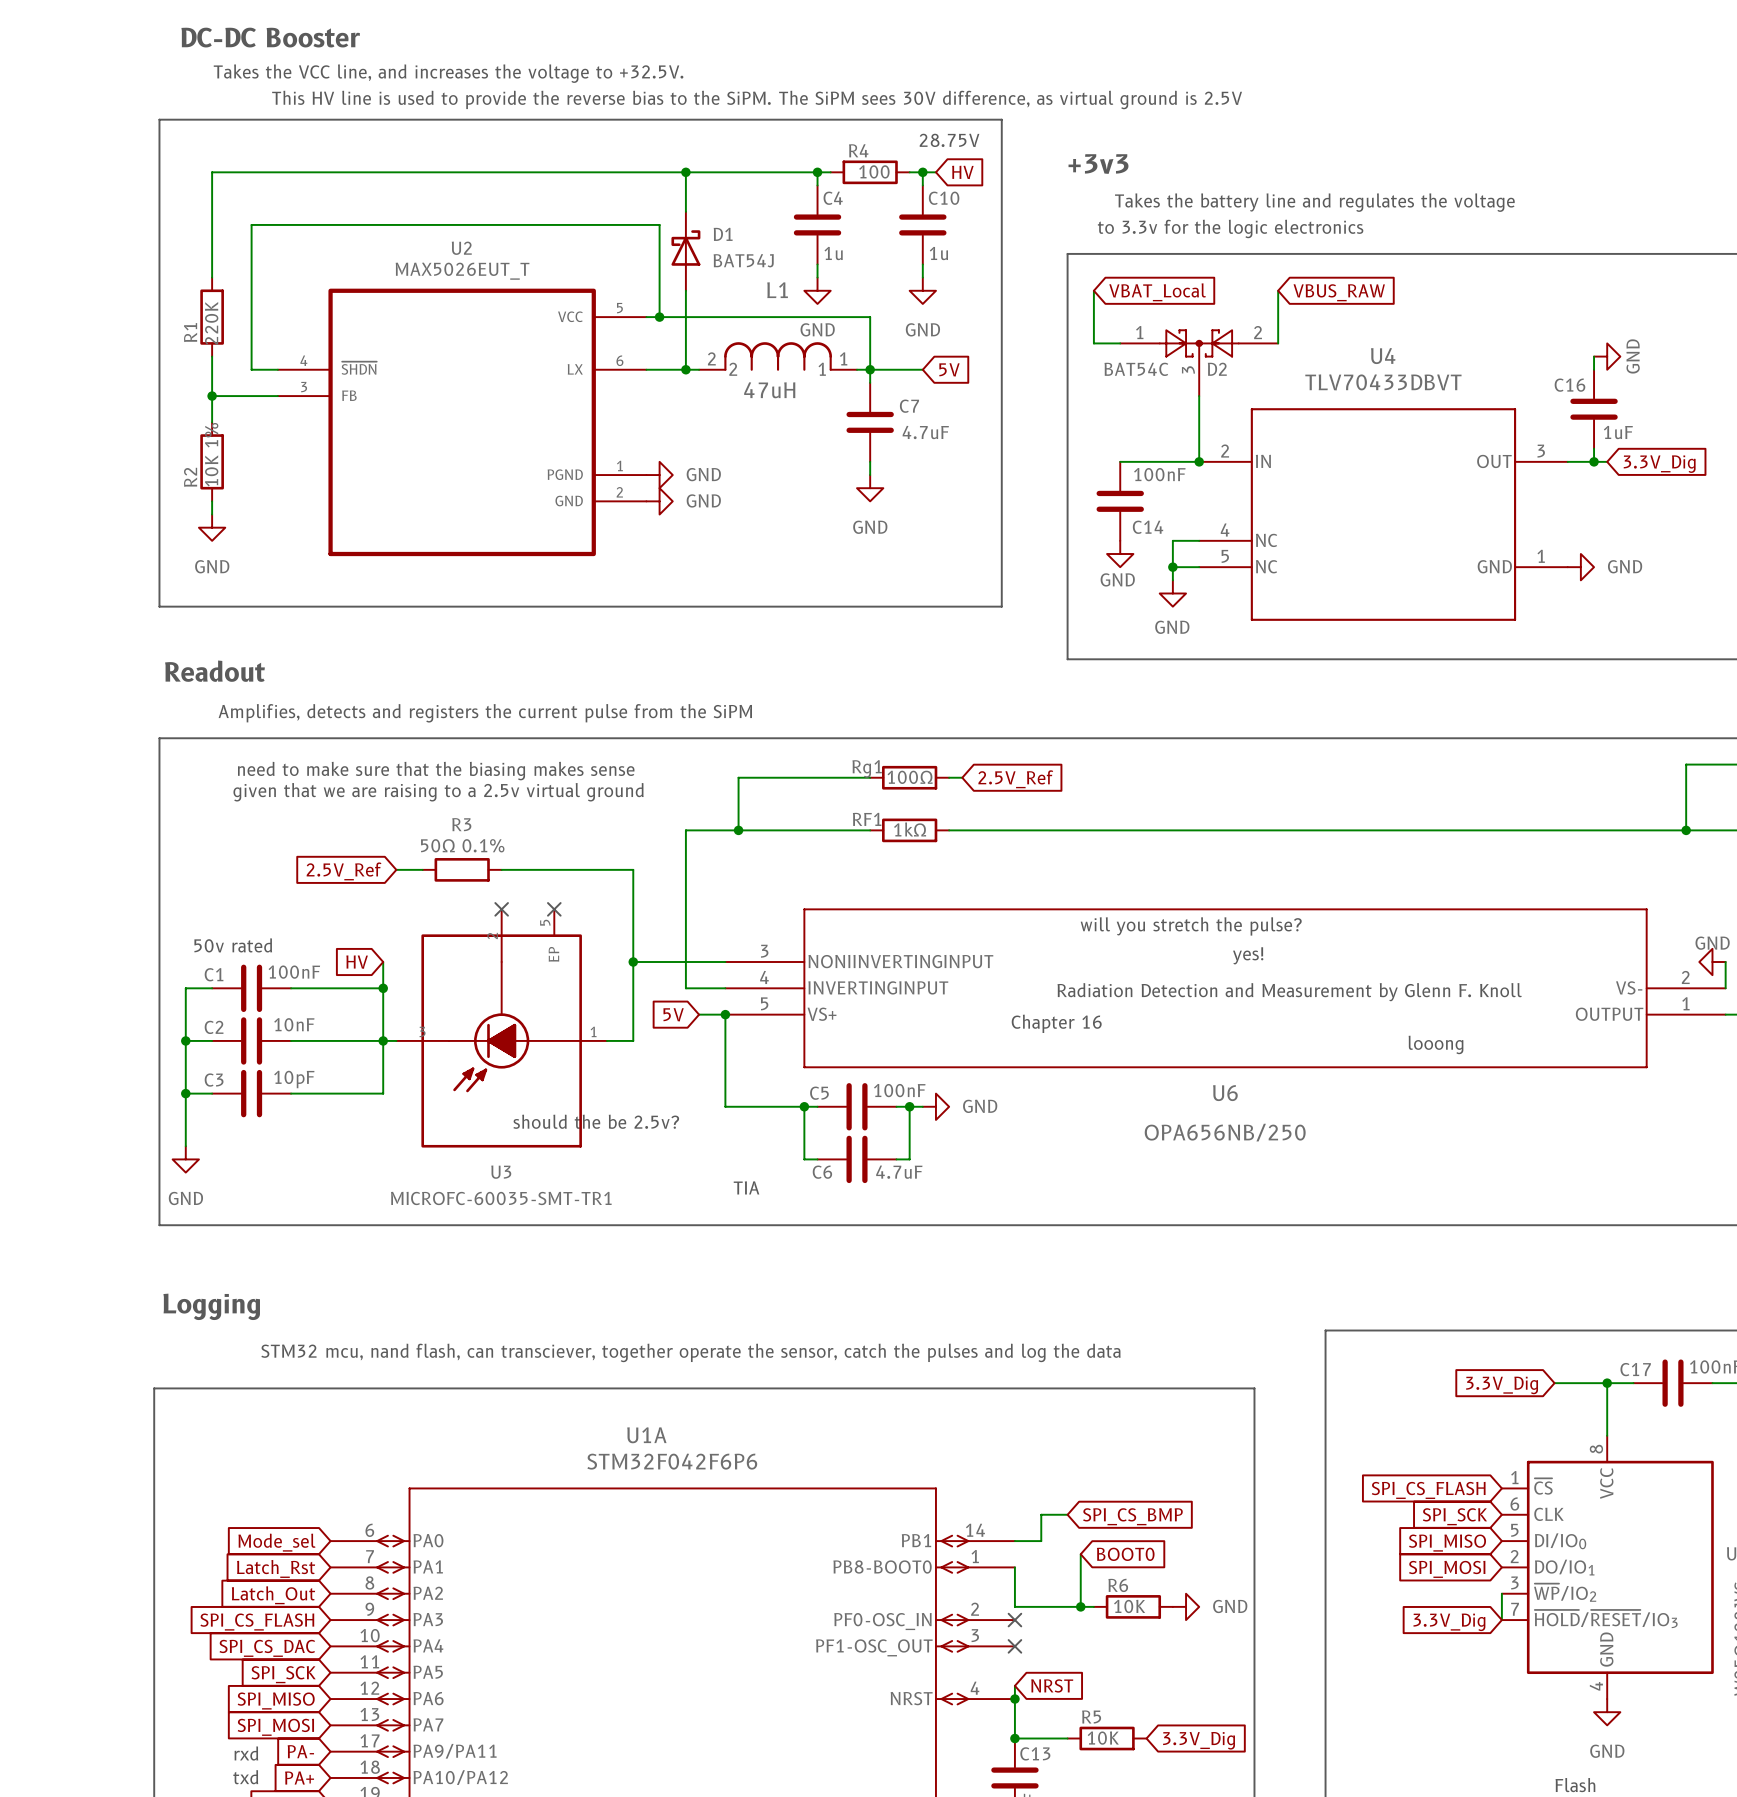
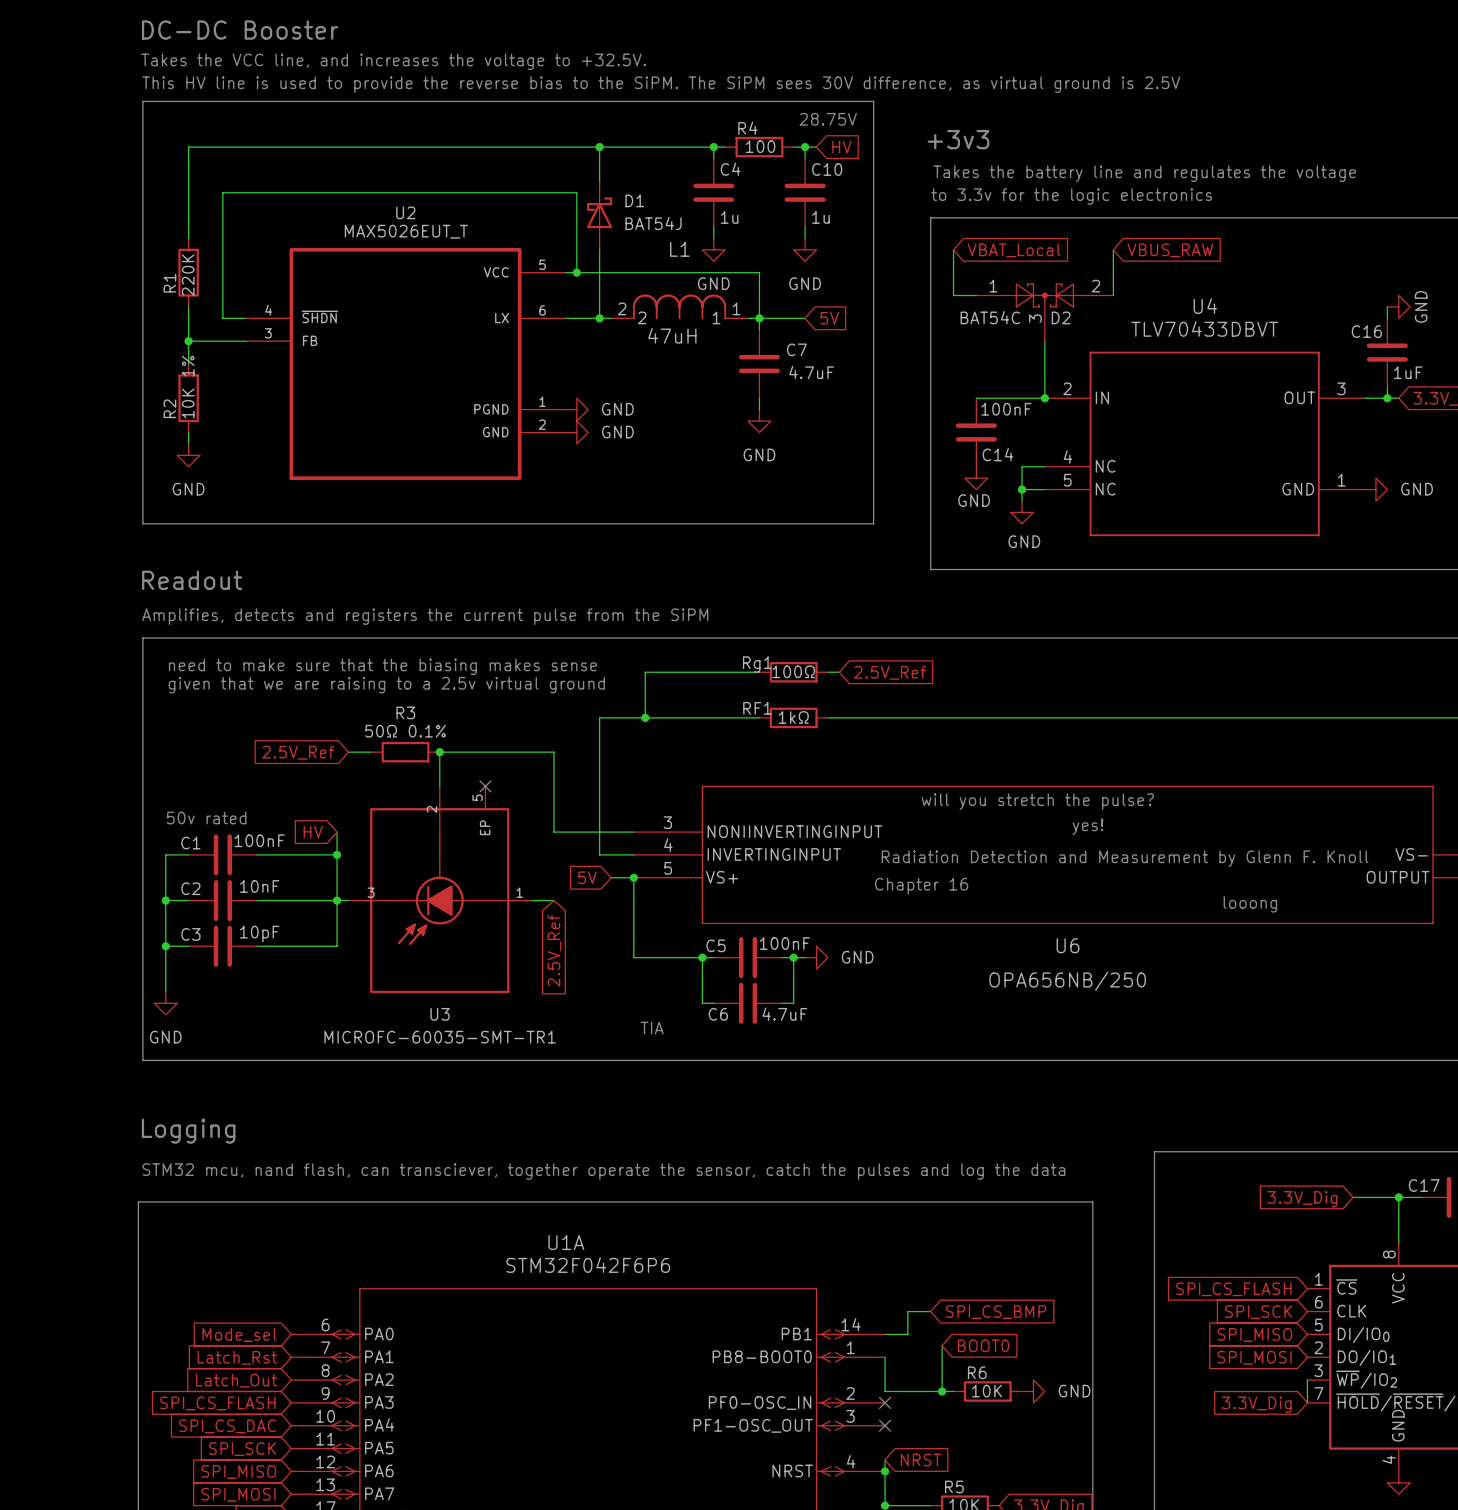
wire: none -> (439, 752) (439, 786)
junction: none -> (439, 752)
no-connect mark: (501, 909) -> none
wire: (633, 961) (633, 1040) -> none
junction: (633, 961) -> none
global label: none -> 2.5V_Ref (554, 950)
text: should the be 2.5v? (596, 1121) -> none

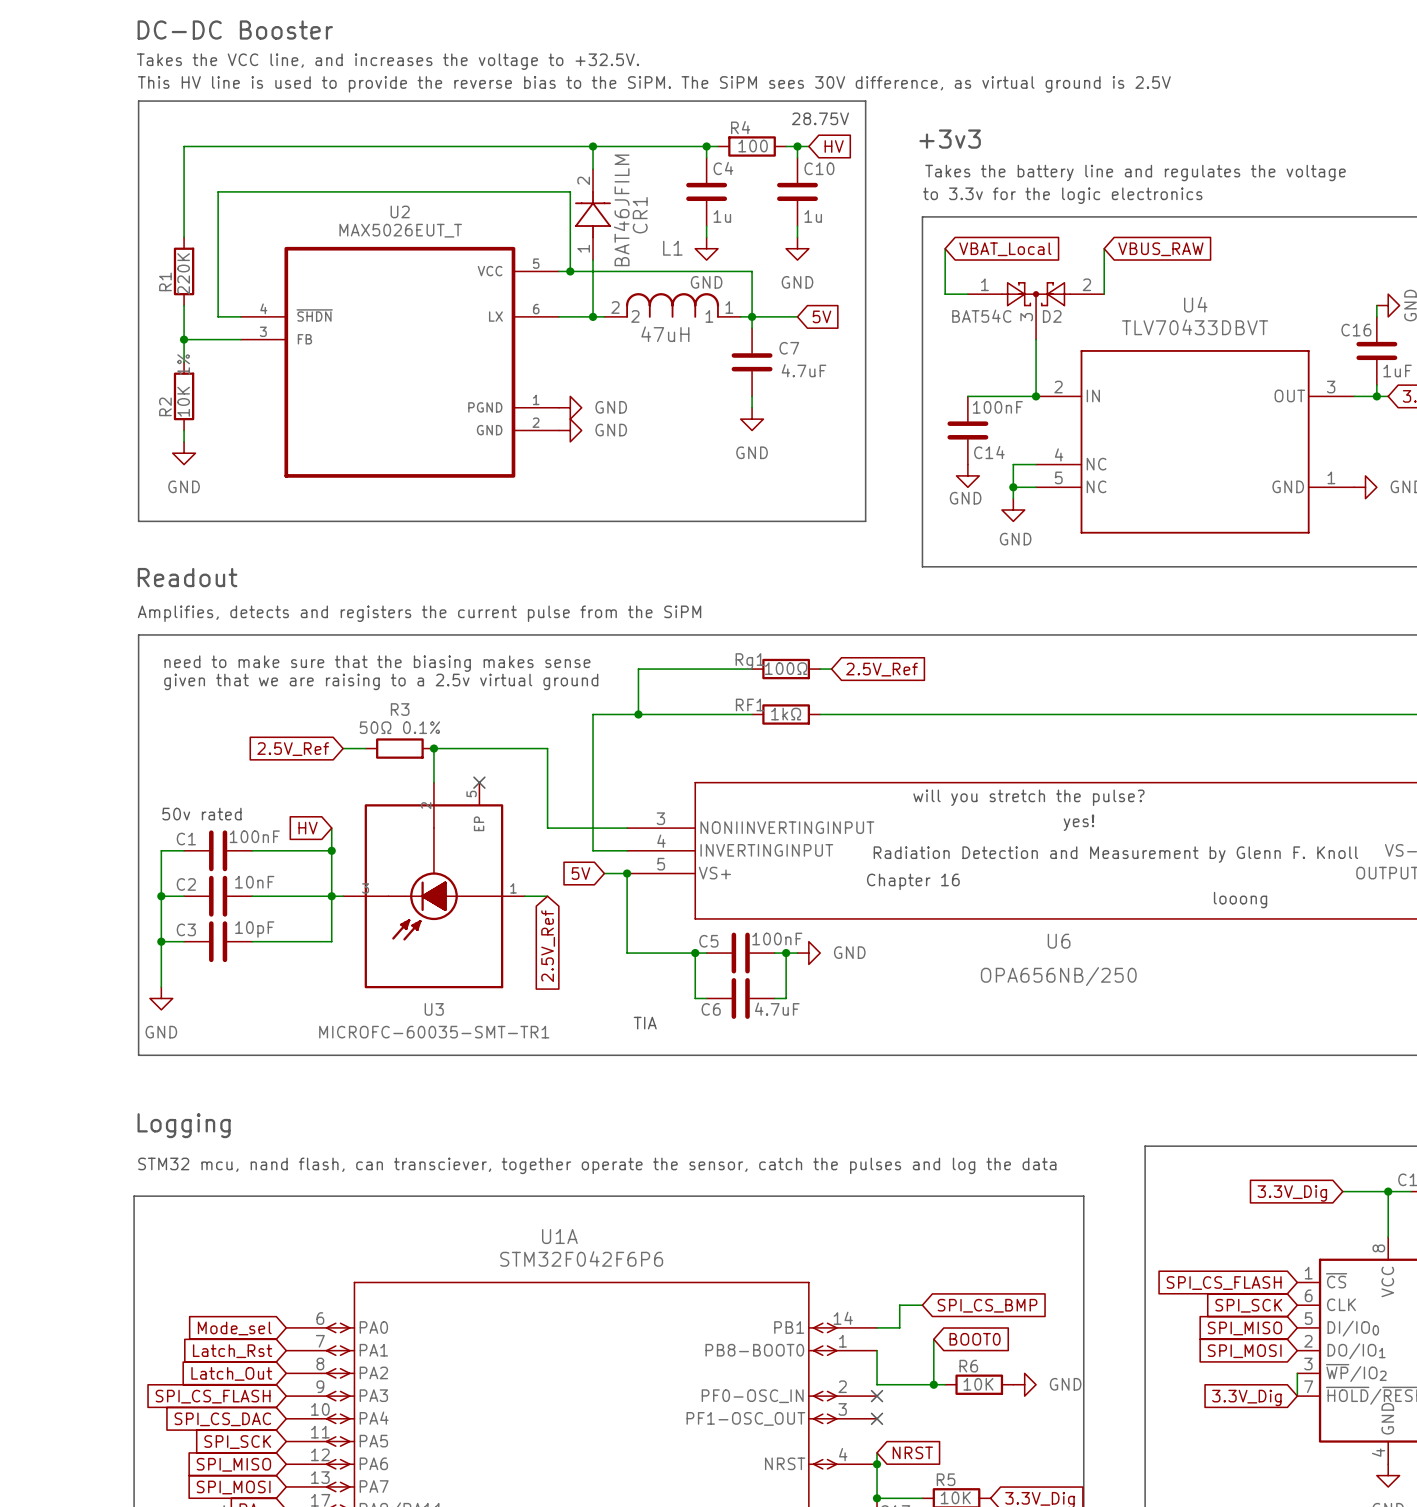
D1: BAT54J (599, 215) -> none
CR1: none -> BAT46JFILM (593, 214)

